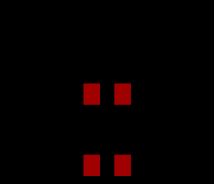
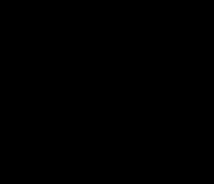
part: (107, 94) -> none
part: (107, 165) -> none

